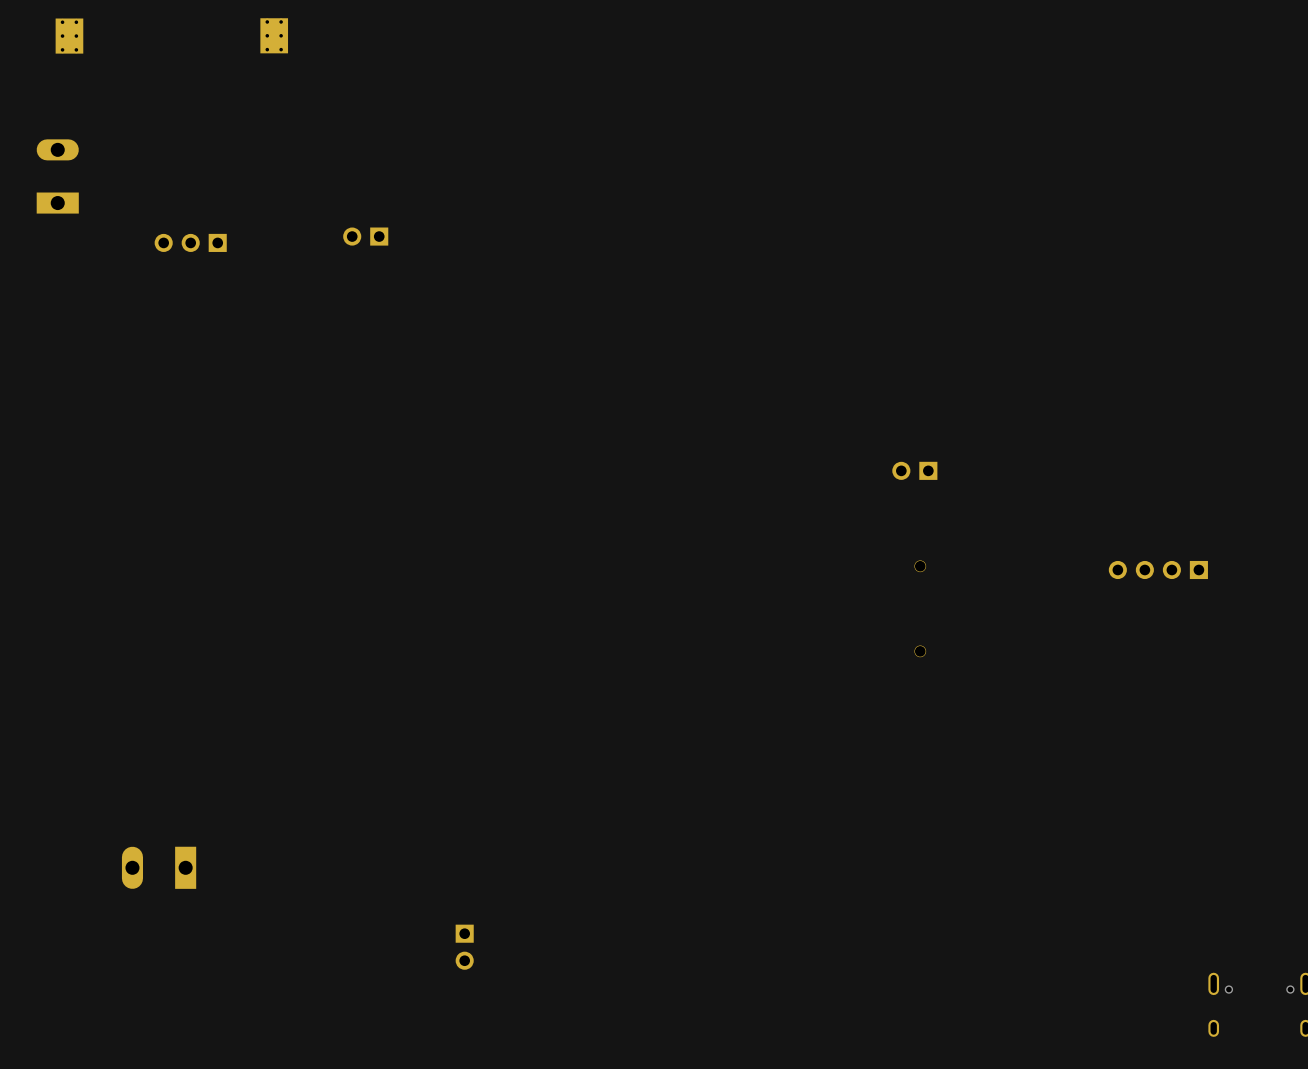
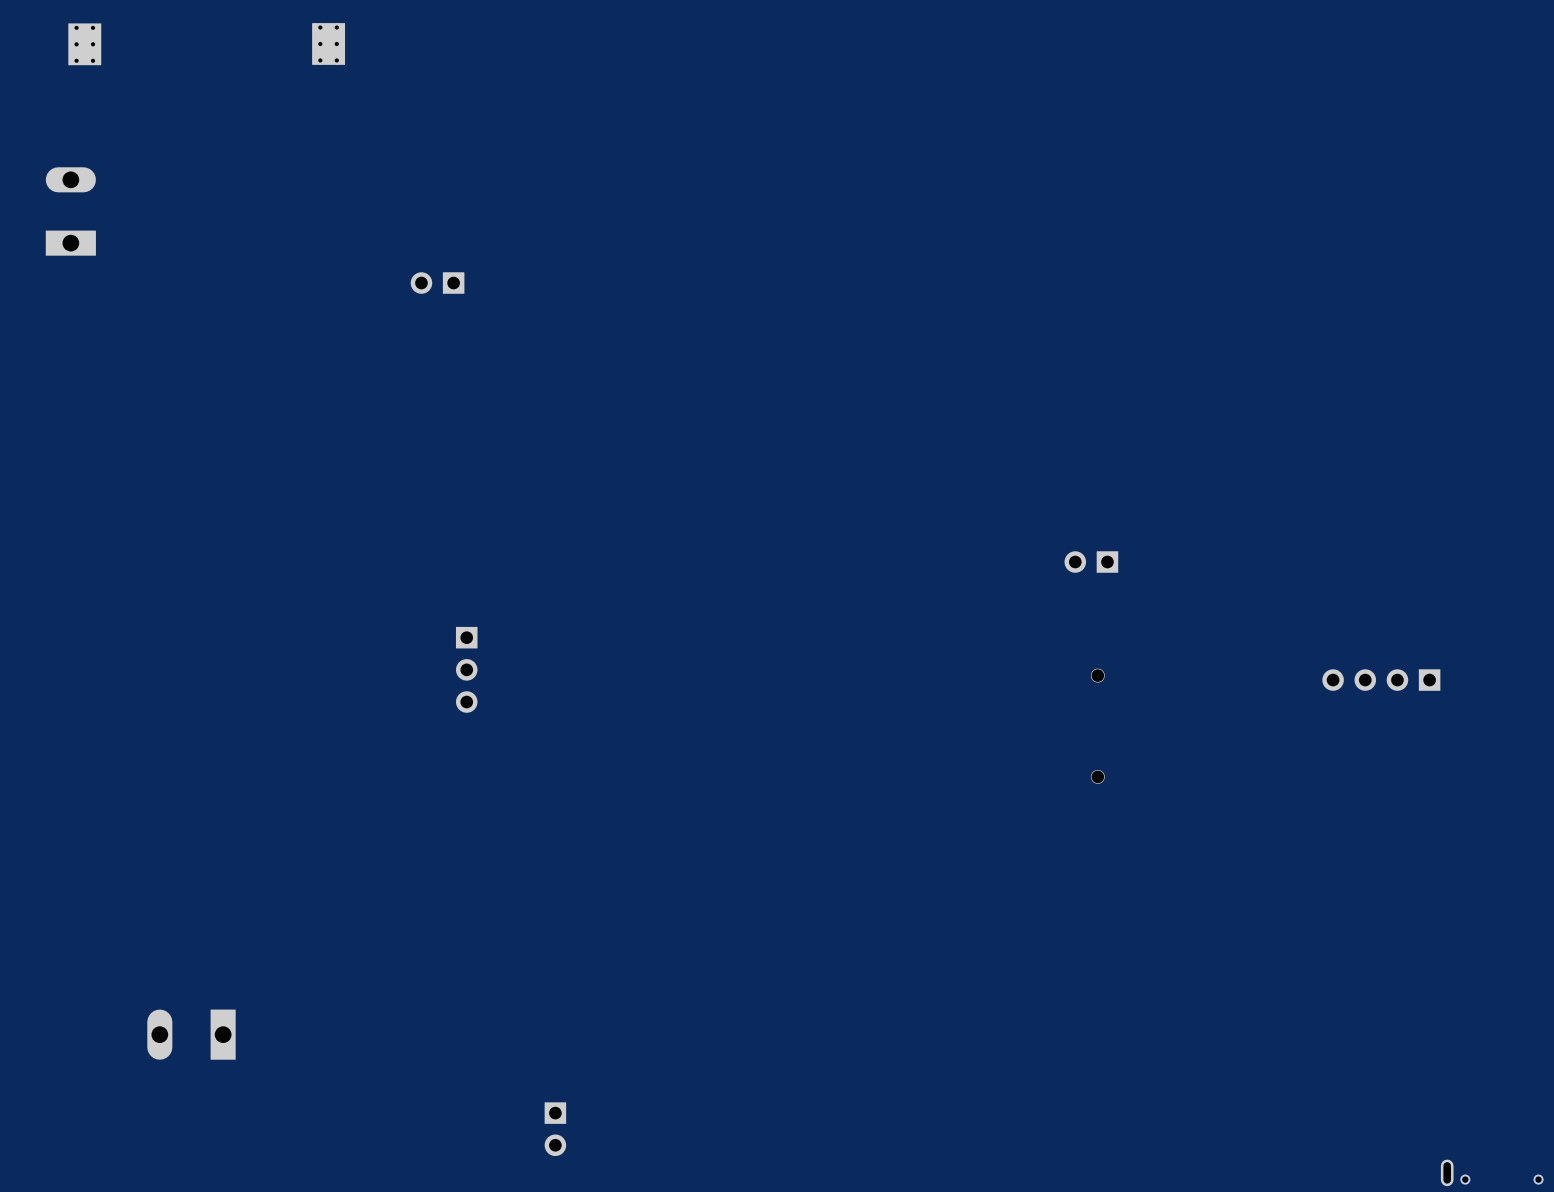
part: (190, 242) -> none
part: none -> (466, 669)

